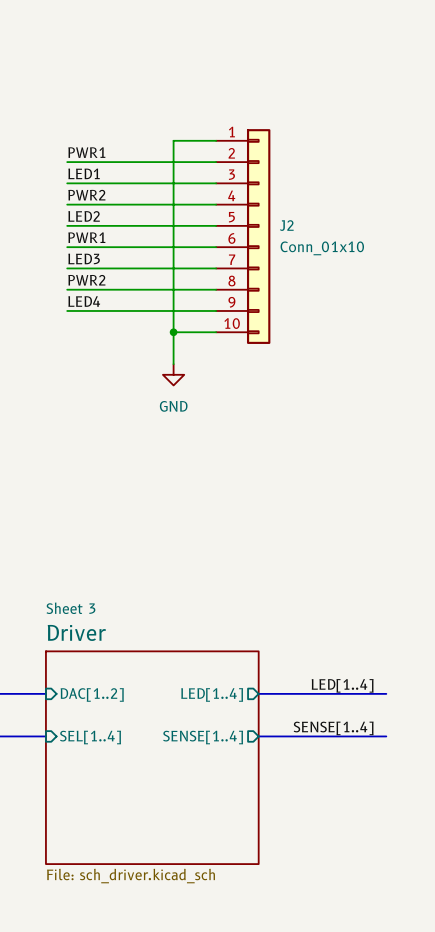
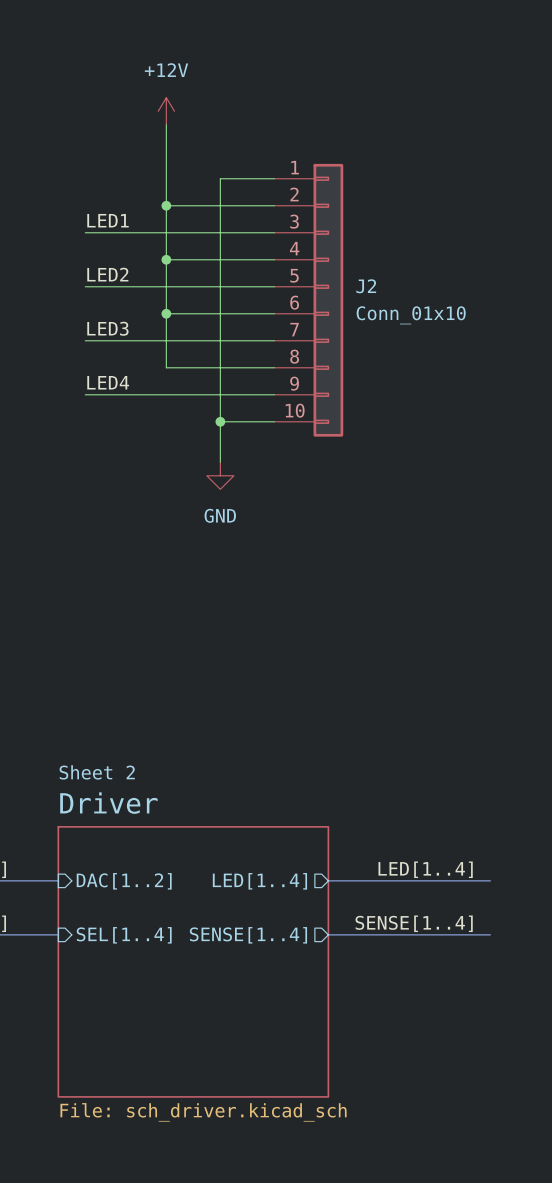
power symbol: none -> +12V (166, 111)
label: PWR1 (86, 152) -> none
wire: (67, 162) (131, 162) -> none
junction: none -> (166, 205)
label: PWR2 (86, 195) -> none
wire: (67, 204) (131, 204) -> none
junction: none -> (166, 259)
label: PWR1 (86, 237) -> none
wire: (67, 247) (131, 247) -> none
junction: none -> (166, 313)
label: PWR2 (86, 280) -> none
wire: (67, 289) (131, 289) -> (166, 124) (166, 367)
sheet Driver text: Sheet 3 (70, 608) -> Sheet 2 (97, 772)

